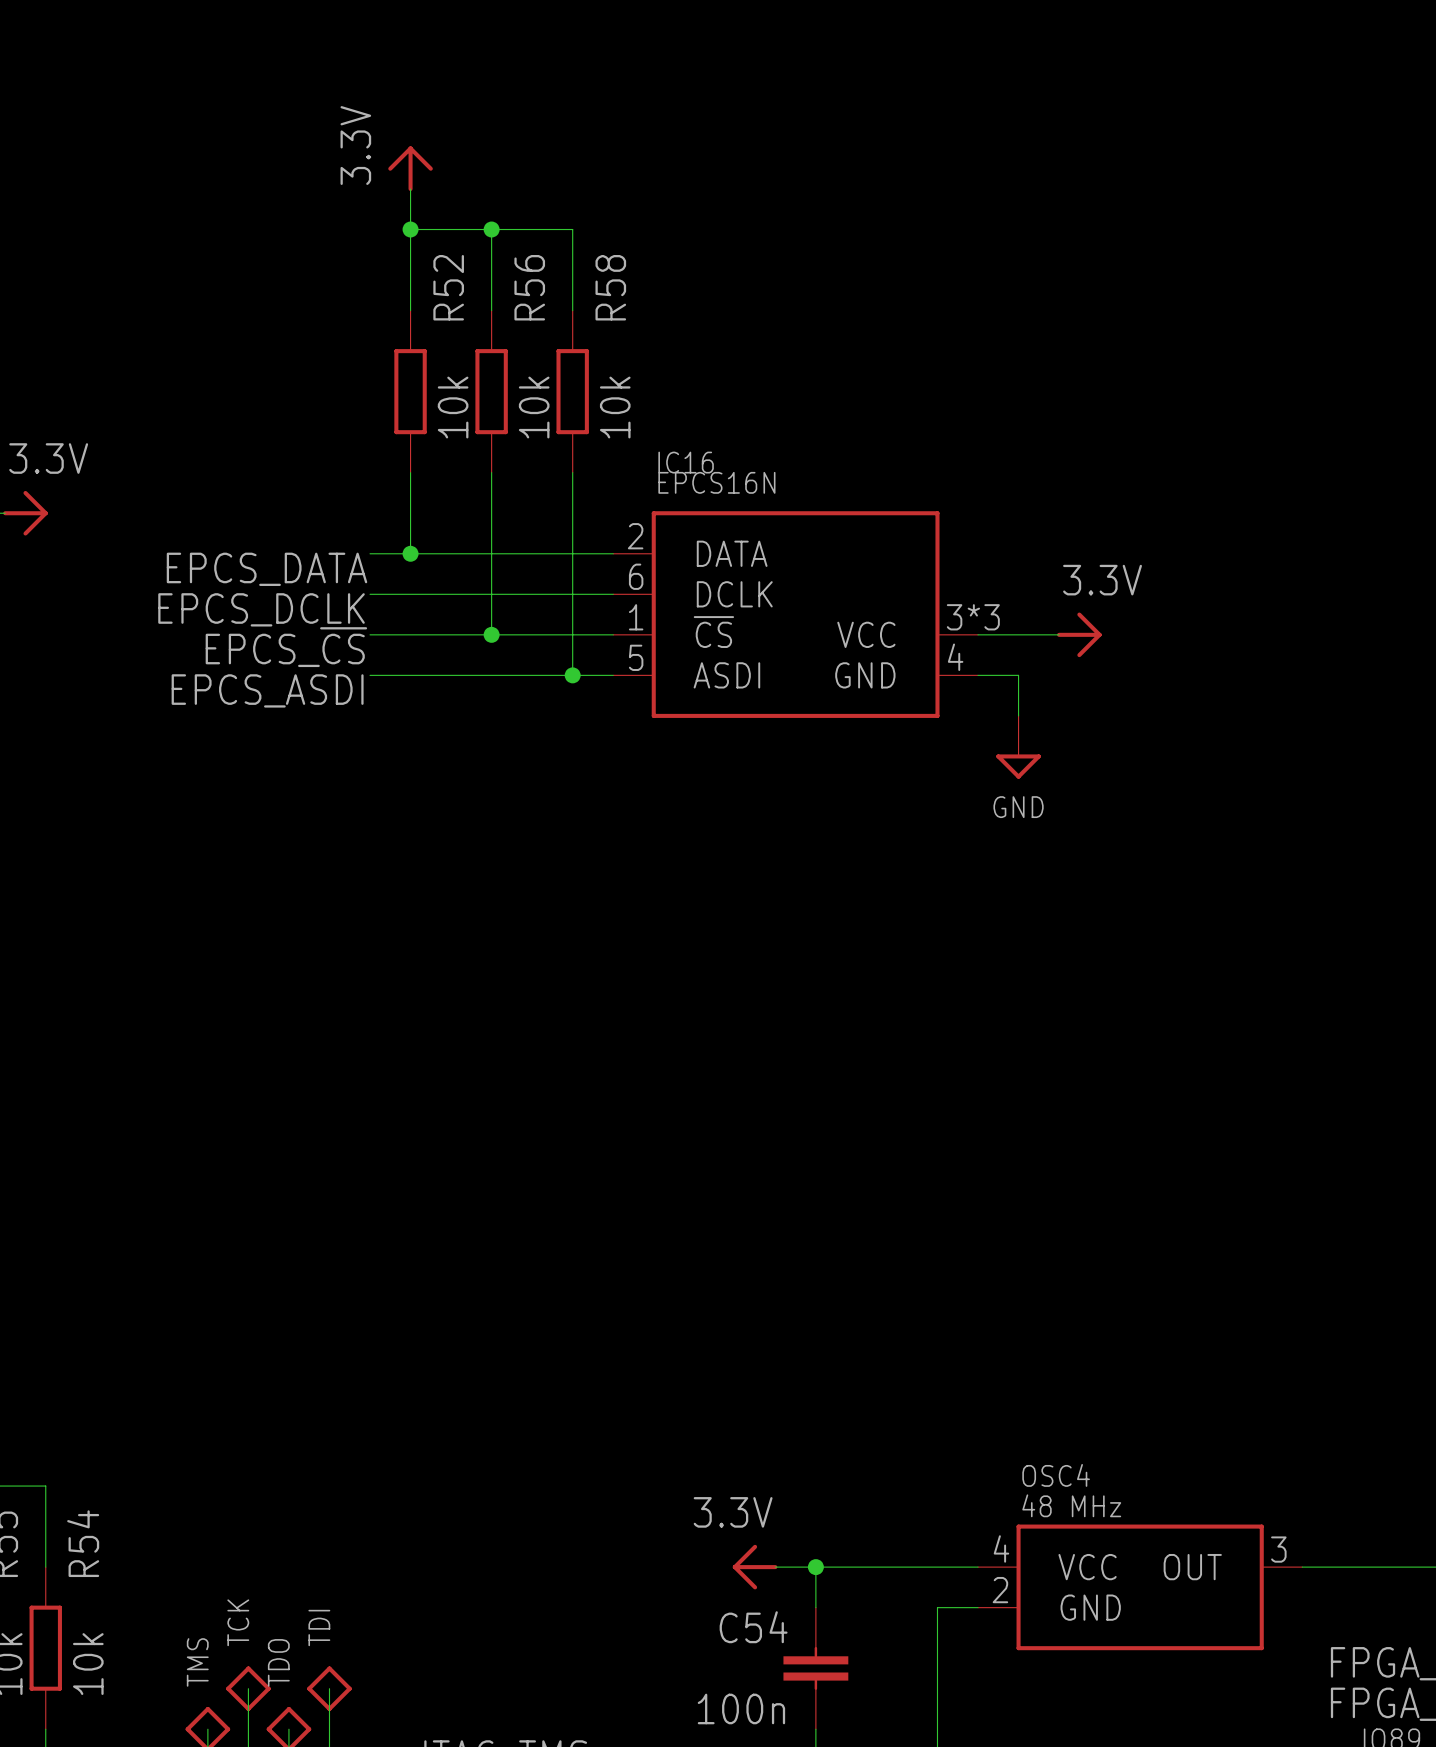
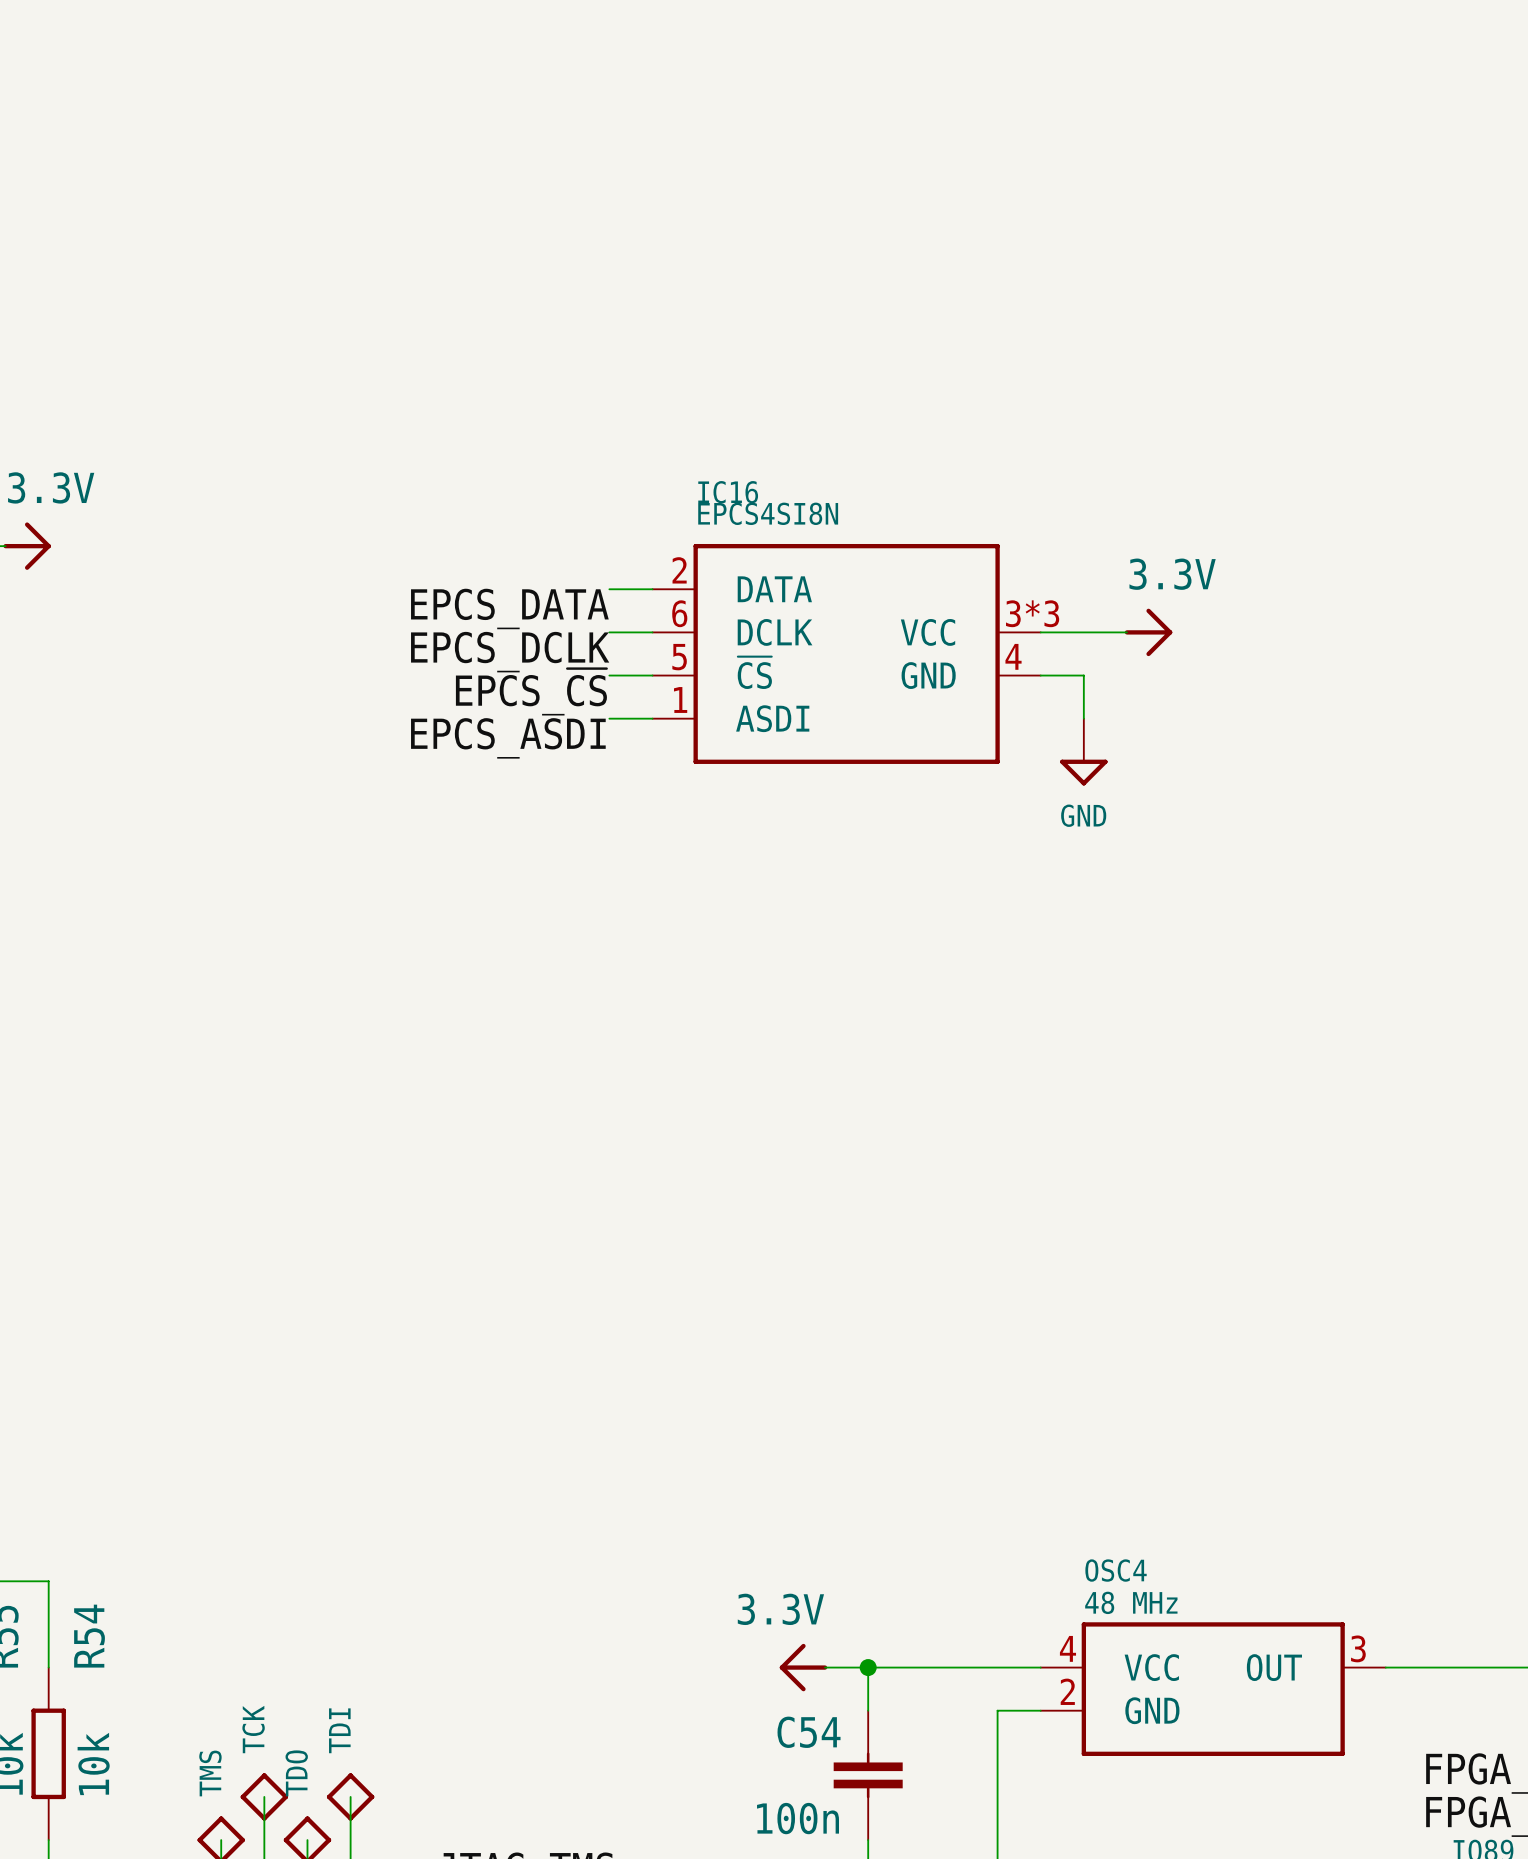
power symbol: 3.3V (410, 168) -> none
wire: (410, 188) (410, 310) -> none
wire: (410, 229) (572, 229) (572, 310) -> none
junction: (410, 229) -> none
wire: (491, 229) (491, 310) -> none
junction: (491, 229) -> none
R52: 10k (410, 391) -> none
R56: 10k (491, 391) -> none
R58: 10k (572, 391) -> none
wire: (410, 472) (410, 553) -> none
wire: (491, 472) (491, 634) -> none
wire: (572, 472) (572, 675) (370, 675) -> none
IC16 value: EPCS16N (716, 482) -> EPCS4SI8N (768, 513)
IC16 symbol: [613, 511, 979, 718] -> [652, 543, 1041, 764]
wire: (370, 553) (572, 553) -> none
junction: (410, 553) -> none
label position: EPCS_DATA (266, 569) -> EPCS_DATA (509, 608)
wire: (370, 594) (572, 594) -> none
wire: none -> (1040, 632) (1126, 632)
label position: EPCS_DCLK (261, 609) -> EPCS_DCLK (510, 652)
wire: (370, 634) (572, 634) -> none
junction: (491, 634) -> none
wire: (1018, 634) (1059, 634) -> (1083, 675) (1083, 718)
power symbol position: 3.3V (1079, 634) -> 3.3V (1148, 632)
label position: EPCS_~{CS} (286, 647) -> EPCS_~{CS} (531, 692)
junction: (572, 675) -> none
wire: (978, 675) (1018, 675) (1018, 715) -> none
label position: EPCS_ASDI (267, 690) -> EPCS_ASDI (508, 738)
power symbol position: GND (1018, 747) -> GND (1083, 752)

